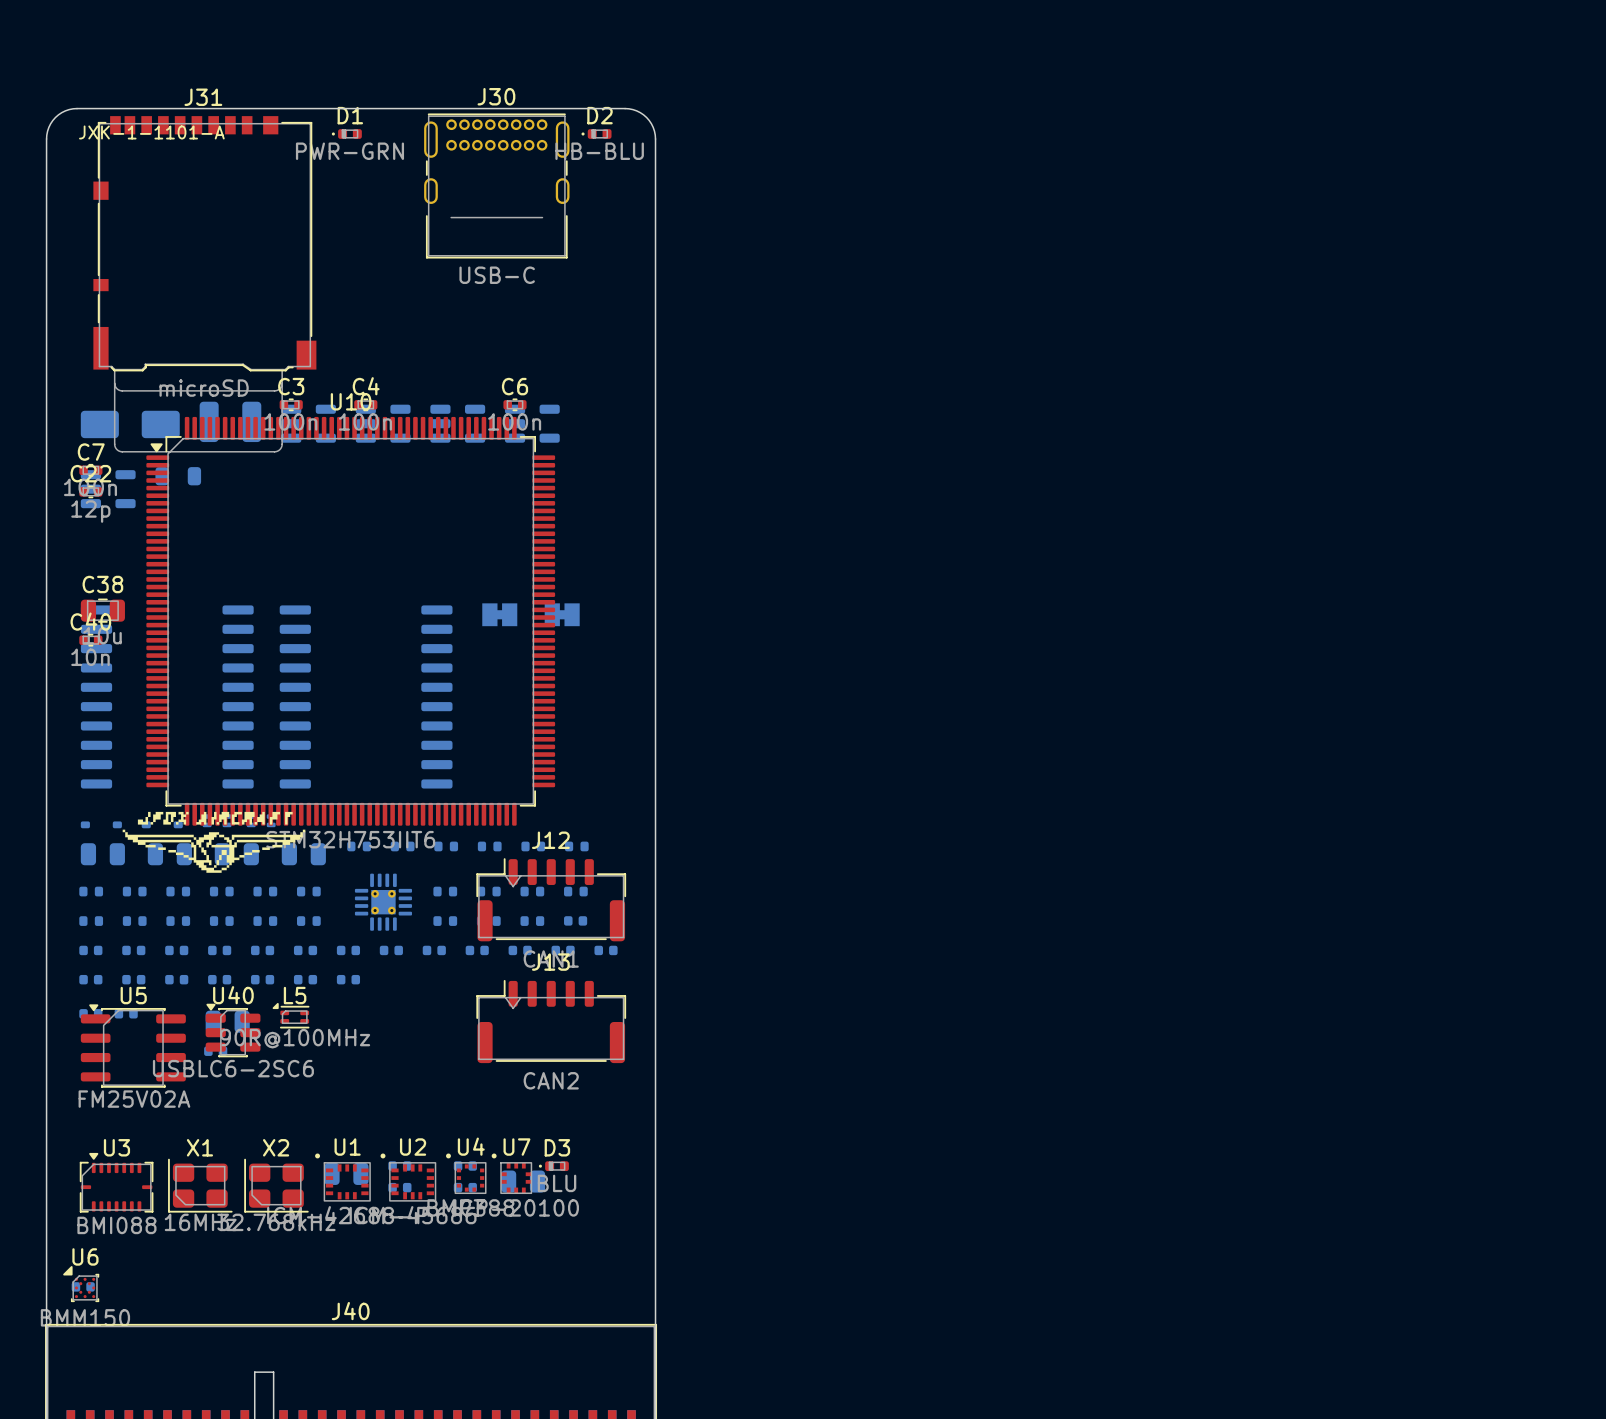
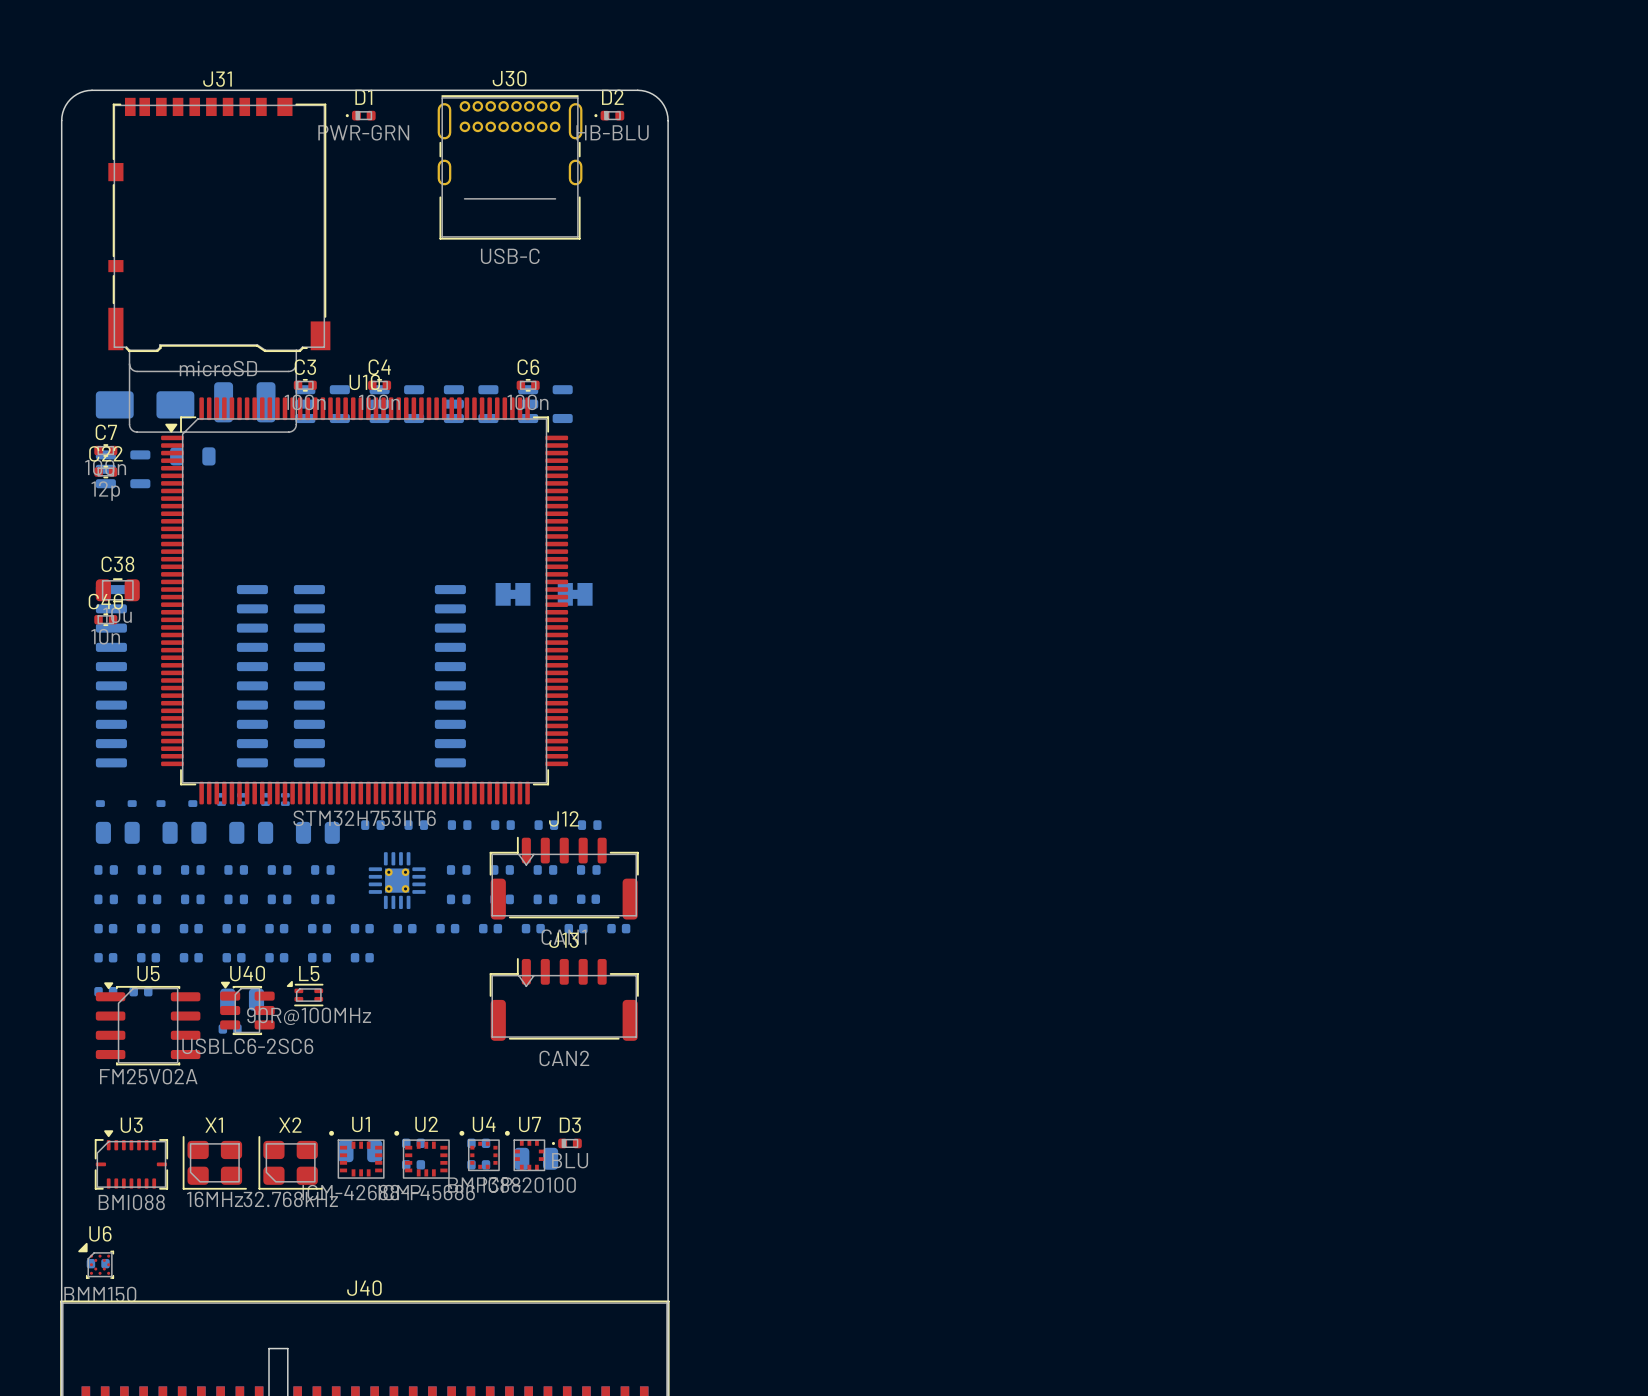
text: JXK-1-1101-A (151, 132) -> none
drawing: [122, 811, 306, 873] -> none

